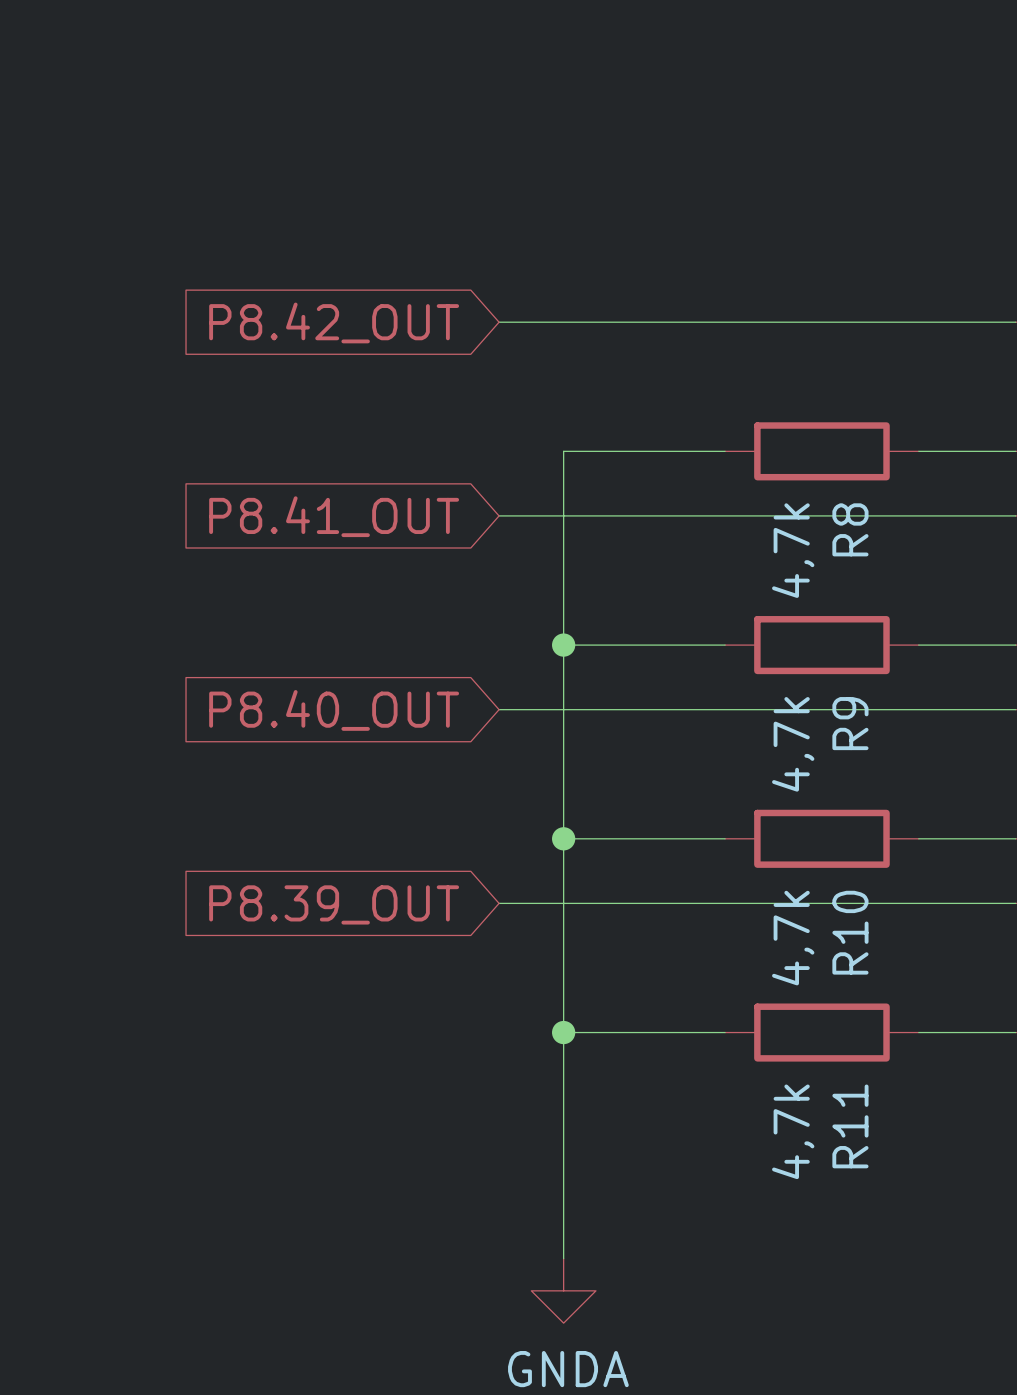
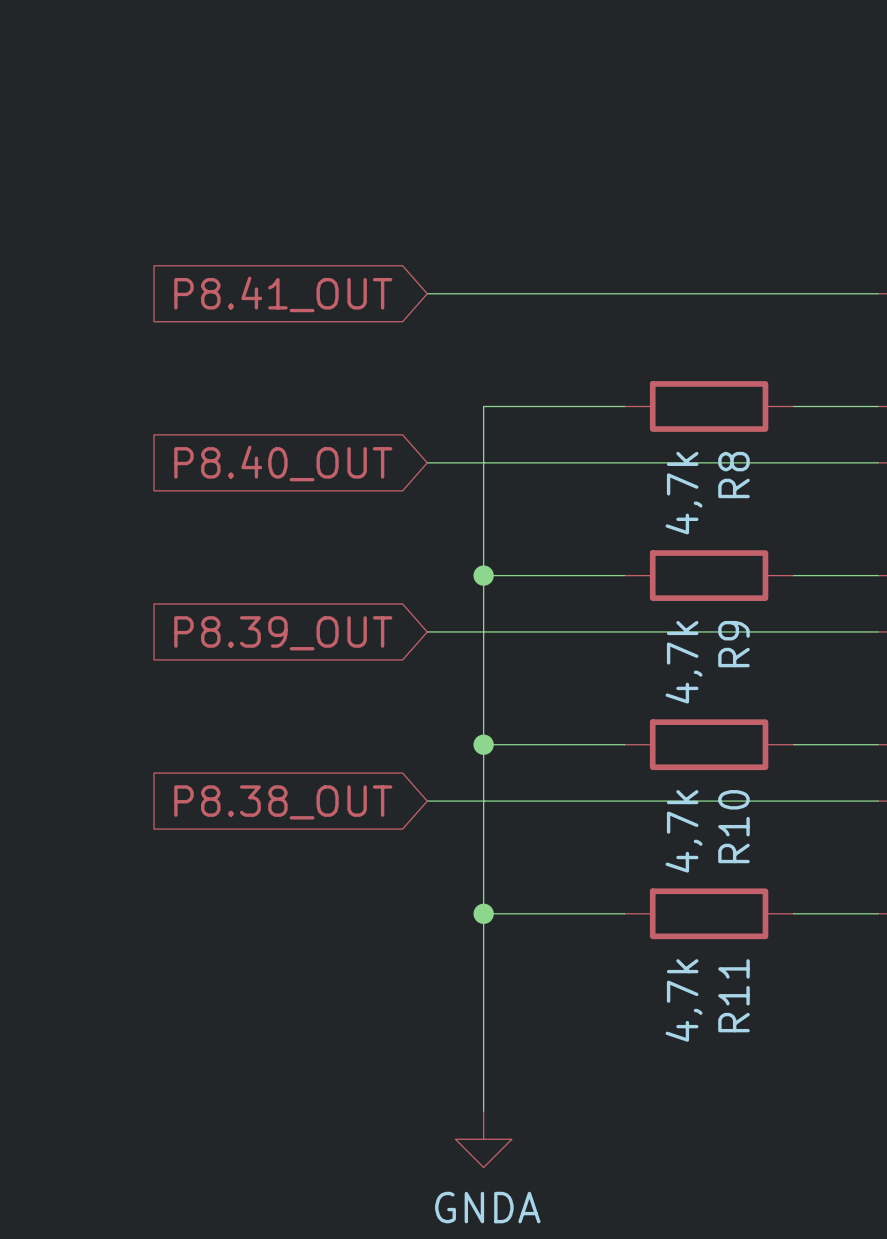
global label: P8.42_OUT (334, 322) -> P8.41_OUT (283, 294)
global label: P8.41_OUT (334, 516) -> P8.40_OUT (283, 463)
global label: P8.40_OUT (334, 710) -> P8.39_OUT (283, 633)
global label: P8.39_OUT (334, 904) -> P8.38_OUT (283, 802)

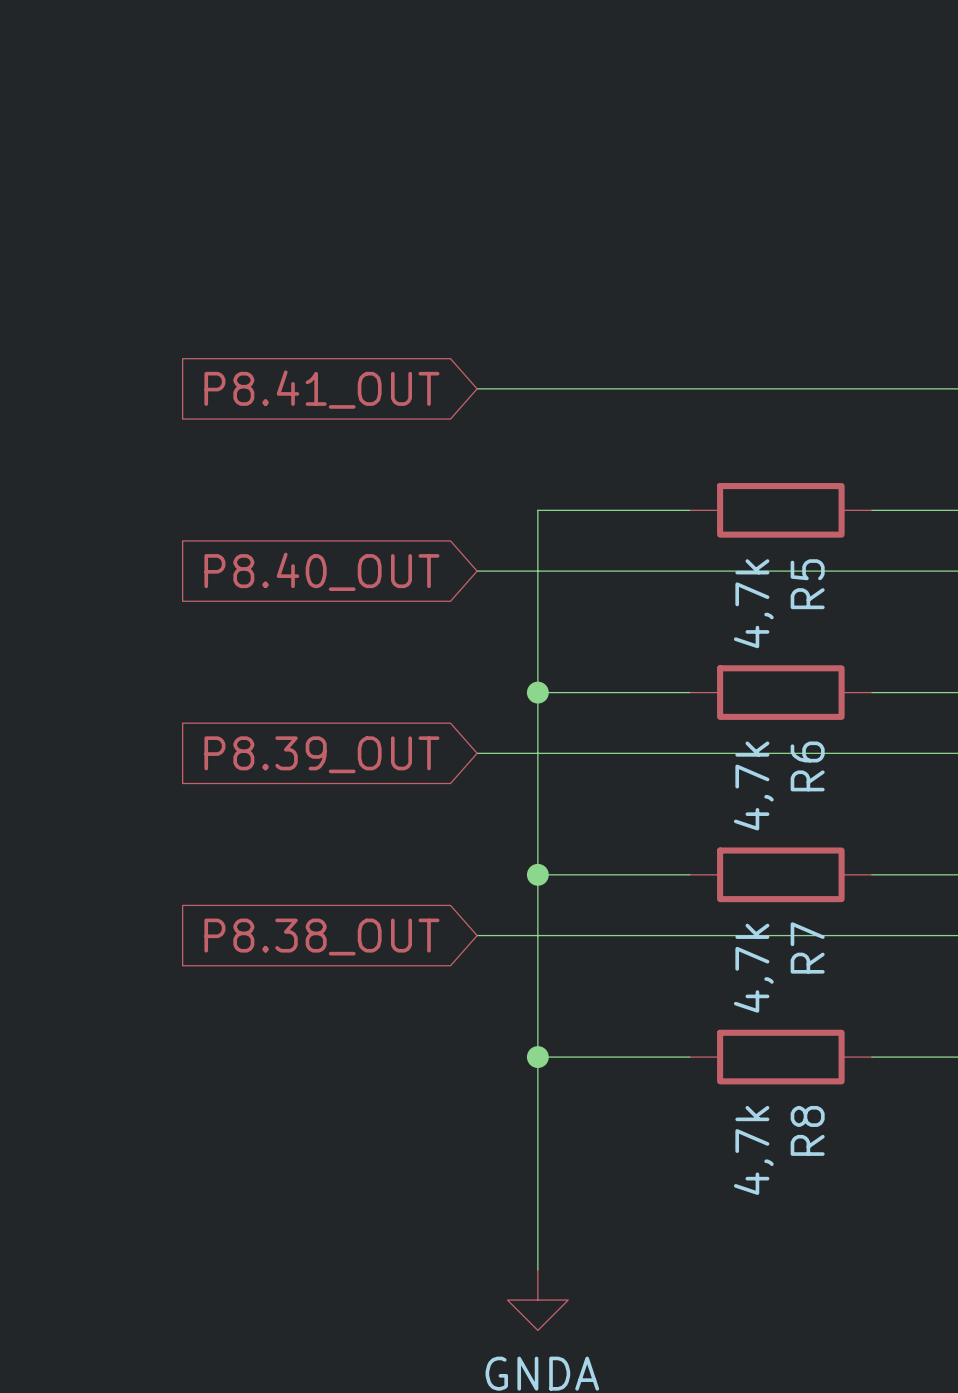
R8 name: R8 (733, 475) -> R5 (807, 584)
R9 name: R9 (733, 644) -> R6 (807, 766)
R10 name: R10 (733, 826) -> R7 (807, 947)
R11 name: R11 (733, 995) -> R8 (807, 1130)

